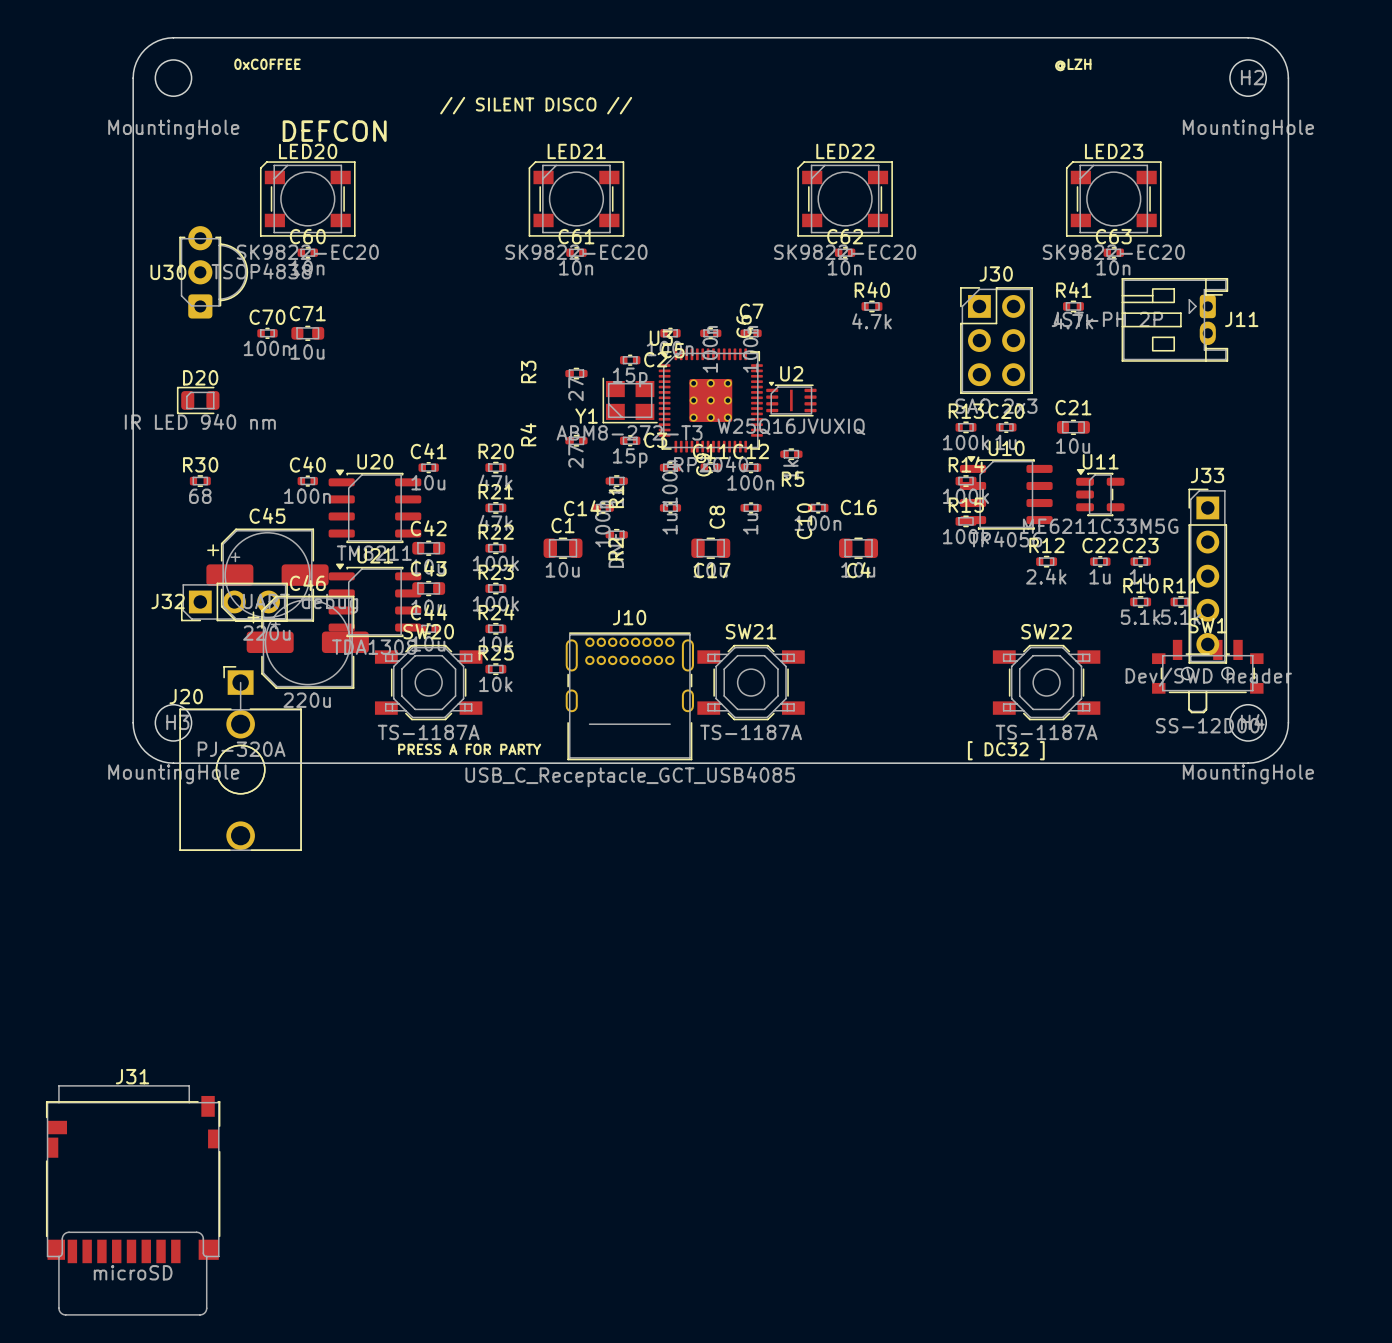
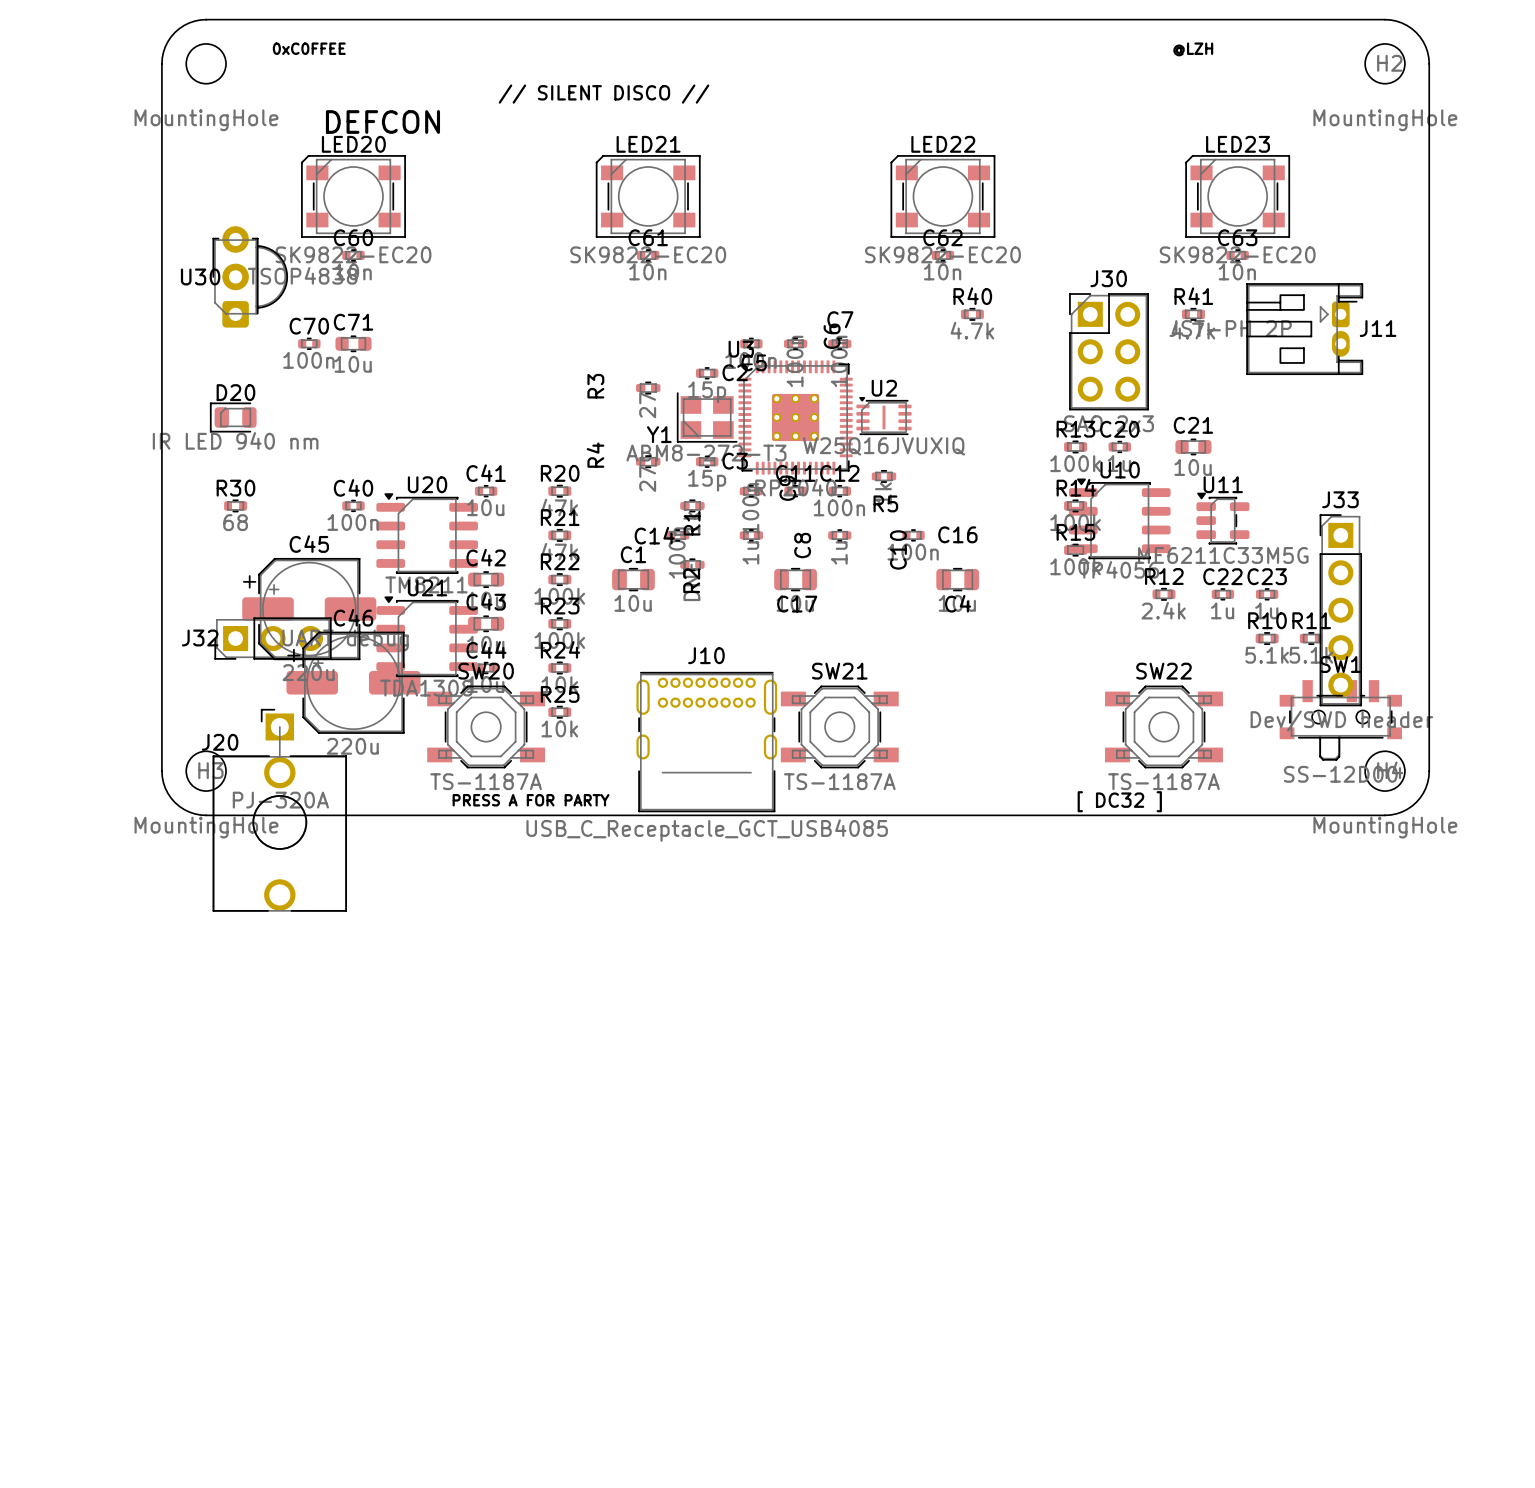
J31: microSD (133, 1200) -> none

